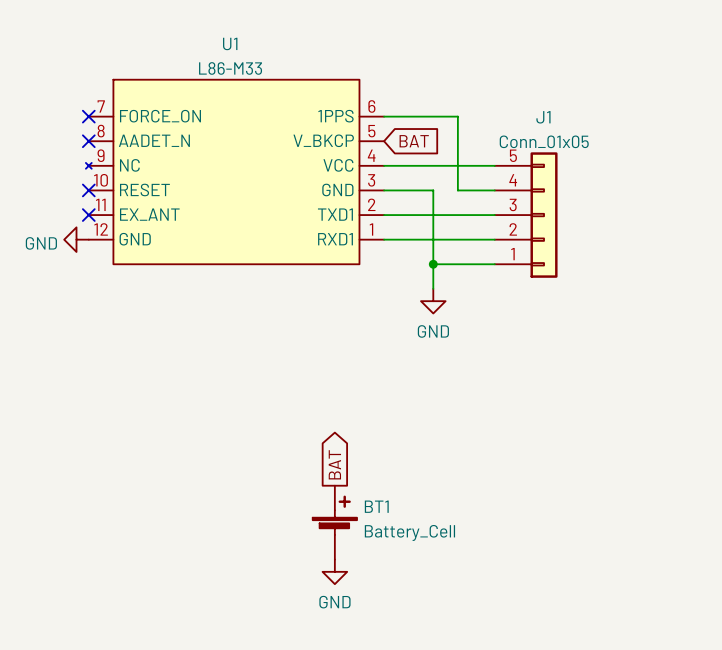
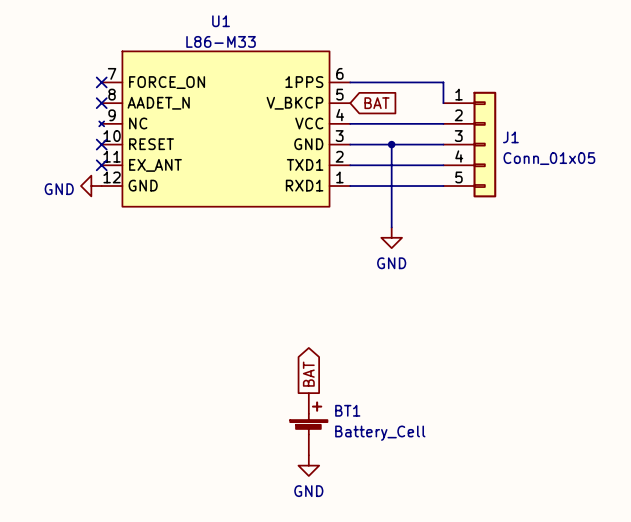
wire: (457, 116) (457, 190) -> (412, 82) (443, 82) (443, 103)
J1 name position: J1 (543, 117) -> J1 (510, 137)
J1 value position: Conn_01x05 (544, 141) -> Conn_01x05 (549, 158)
wire: none -> (391, 144) (412, 144)
junction: none -> (391, 144)
J1 flip: as is (544, 215) -> up-down (484, 144)
wire: (433, 264) (494, 264) -> none
junction: (433, 264) -> none

